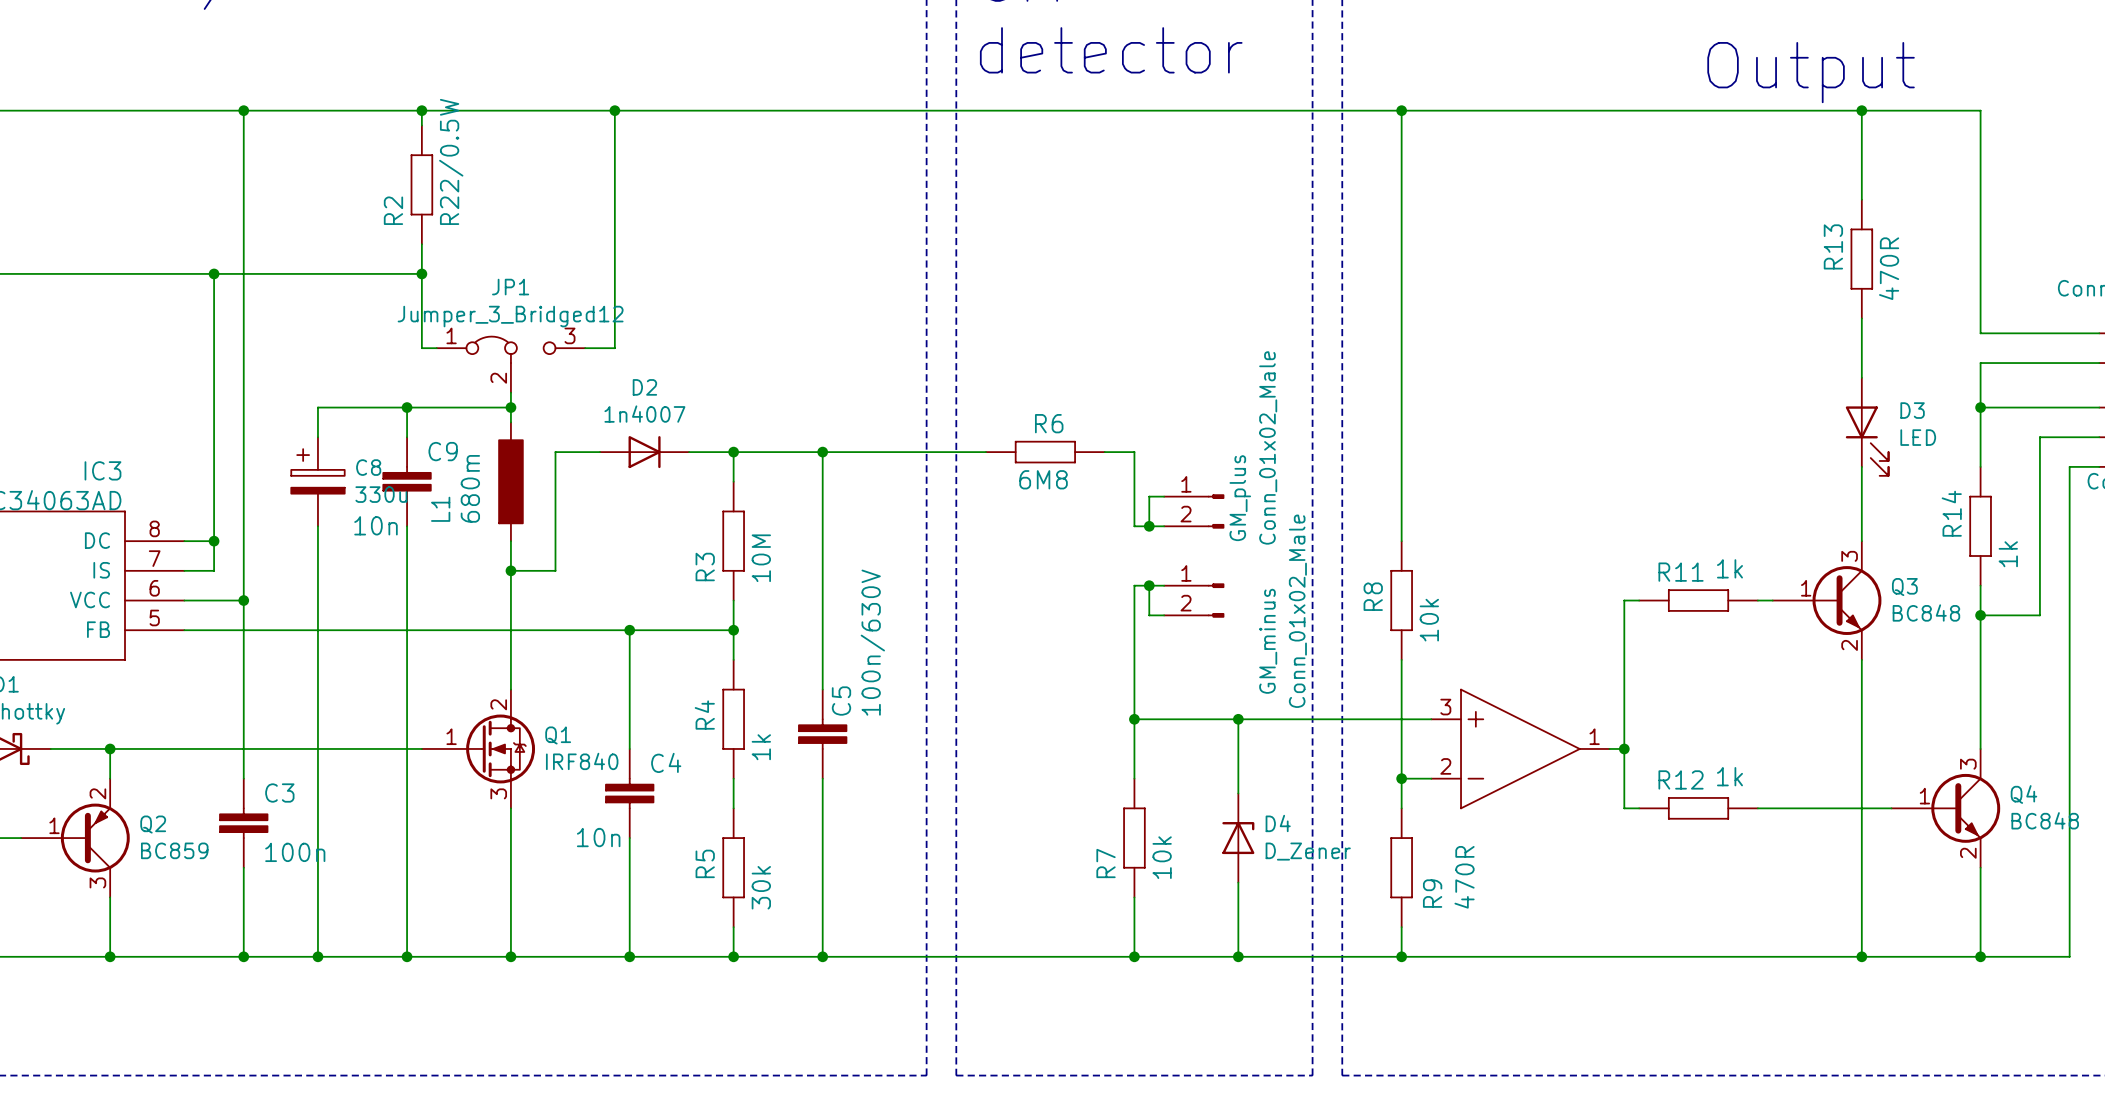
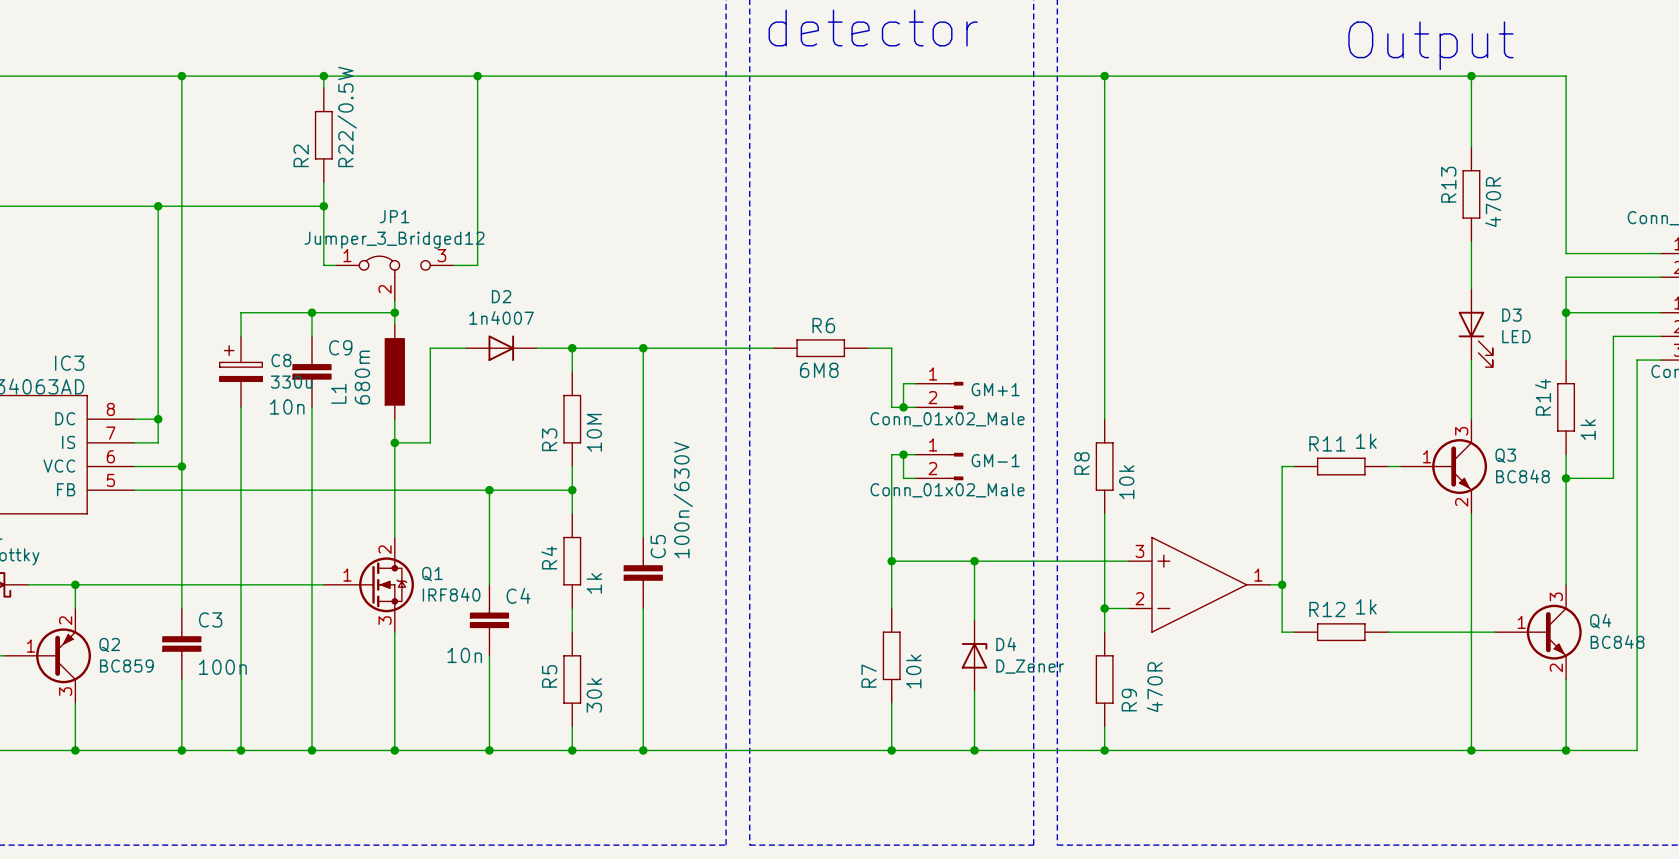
GM_plus value rotation: 0° (1268, 447) -> 90° clockwise (947, 419)
GM_plus name: GM_plus (1240, 498) -> GM+1 (995, 389)
GM_minus value rotation: 0° (1297, 611) -> 90° clockwise (947, 490)
GM_minus name: GM_minus (1268, 641) -> GM-1 (995, 460)

